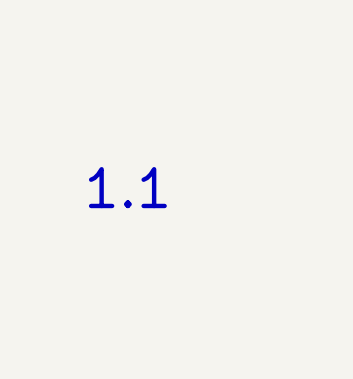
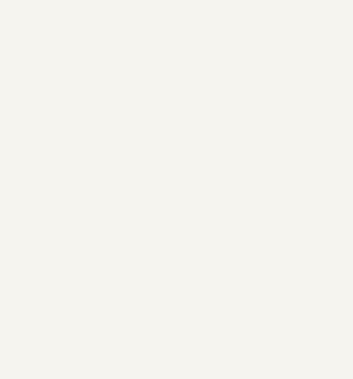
text: 1.1 (127, 187) -> none

